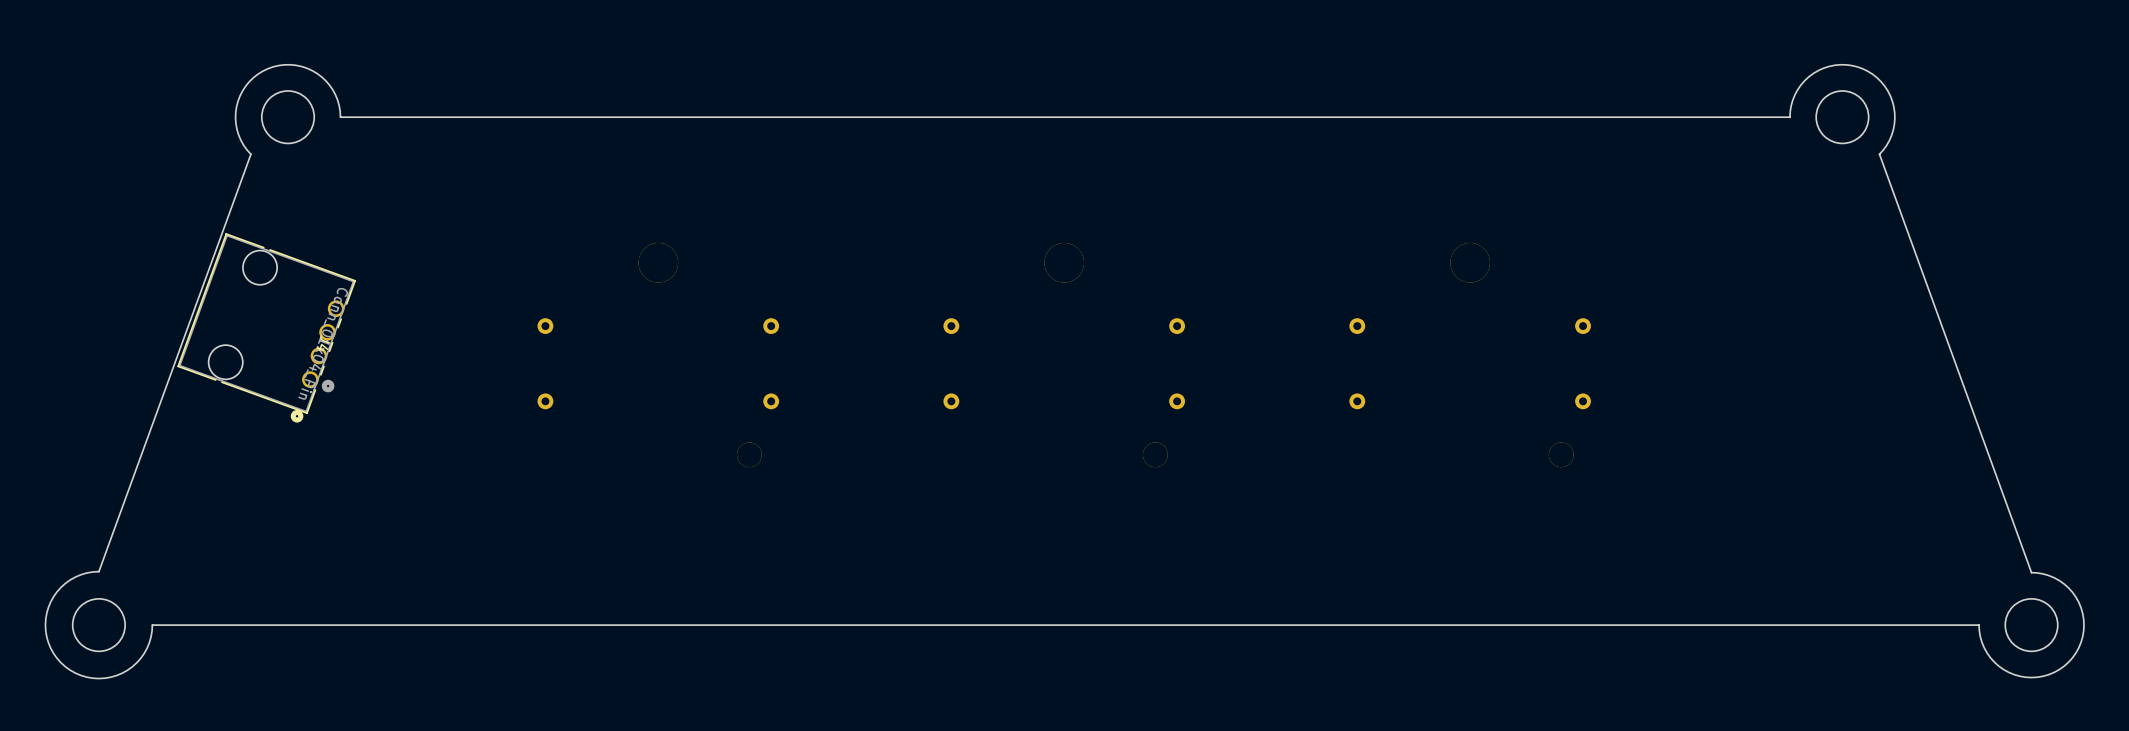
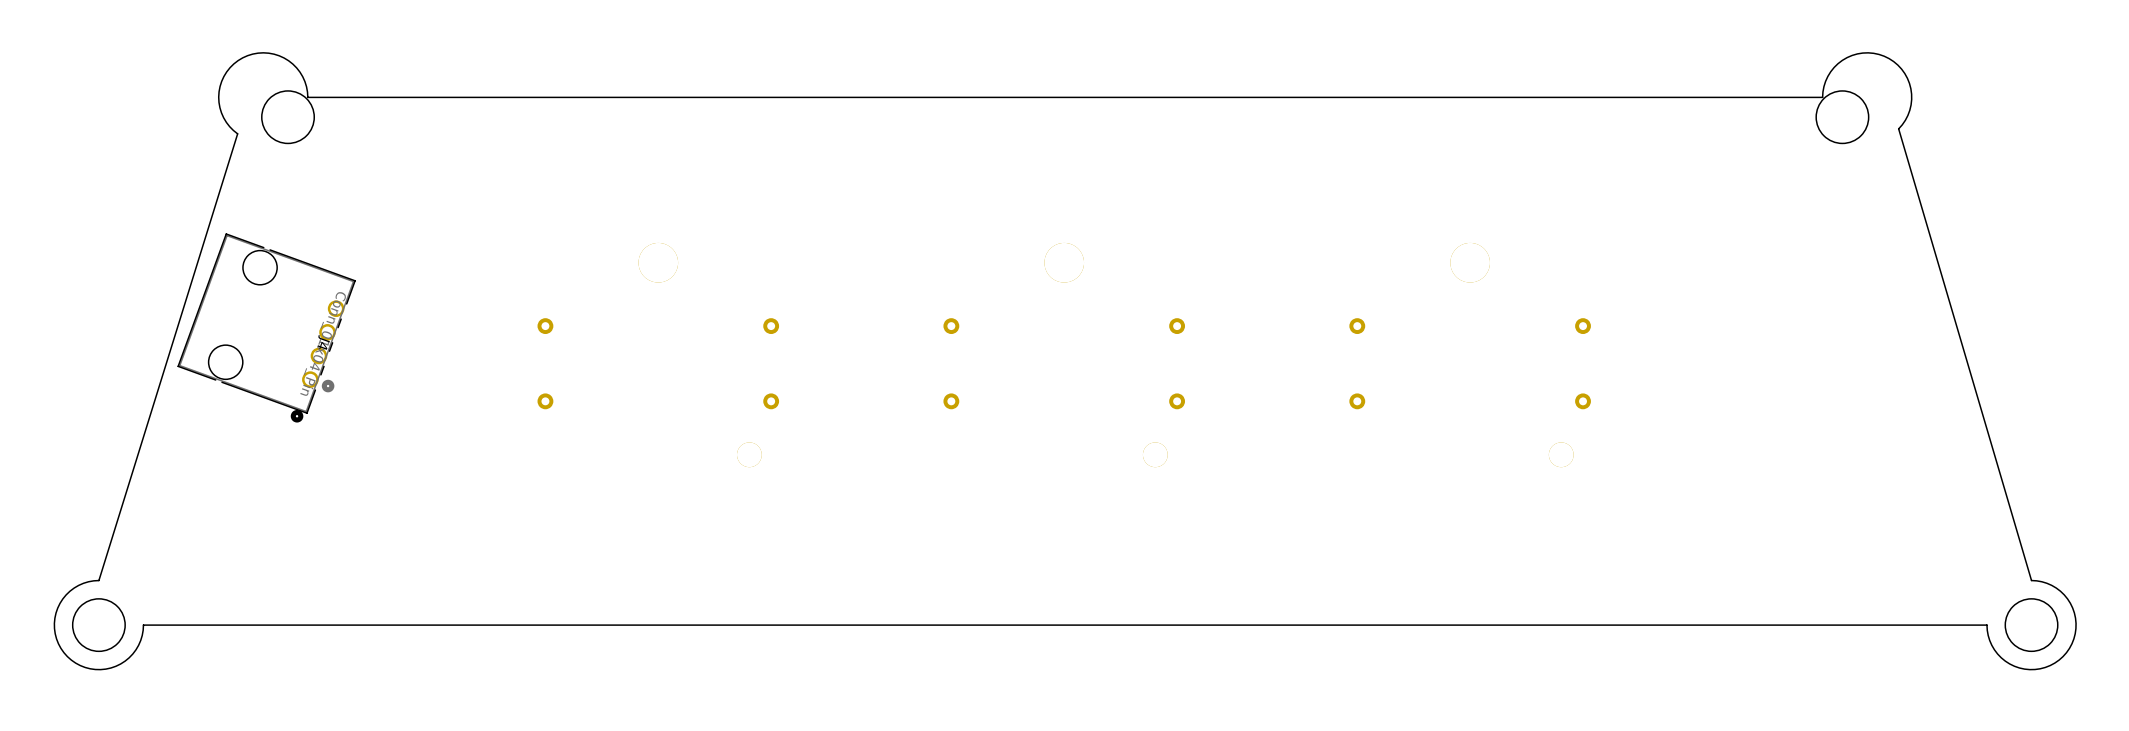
board edge: (1979, 625) (1984, 647) (1994, 662) (2014, 674) (2031, 677) (2054, 672) (2068, 662) (2078, 647) (2084, 625) (2081, 607) (2068, 587) (2054, 577) (2031, 572) (1879, 154) (1886, 145) (1893, 129) (1894, 118) (1892, 101) (1884, 86) (1877, 77) (1857, 66) (1840, 64) (1828, 66) (1808, 77) (1794, 95) (1789, 117) (340, 117) (337, 100) (325, 80) (312, 70) (290, 64) (273, 66) (262, 71) (249, 81) (239, 96) (235, 112) (237, 129) (243, 145) (250, 154) (98, 571) (81, 574) (61, 587) (48, 607) (45, 625) (48, 642) (61, 662) (75, 673) (98, 678) (122, 673) (136, 662) (147, 648) (152, 625) -> (1979, 625) (1986, 625) (1991, 645) (2001, 657) (2014, 666) (2029, 669) (2050, 665) (2063, 656) (2073, 638) (2076, 623) (2072, 608) (2064, 594) (2051, 585) (2031, 580) (1898, 128) (1907, 115) (1911, 105) (1909, 83) (1897, 65) (1879, 54) (1857, 53) (1838, 63) (1825, 81) (1822, 97) (307, 97) (304, 81) (296, 67) (284, 57) (263, 52) (252, 54) (238, 60) (230, 67) (221, 81) (218, 97) (221, 112) (229, 126) (237, 133) (98, 580) (83, 583) (69, 591) (57, 608) (54, 623) (58, 643) (67, 656) (80, 665) (100, 669) (115, 666) (129, 657) (140, 640) (143, 625) (152, 625)

